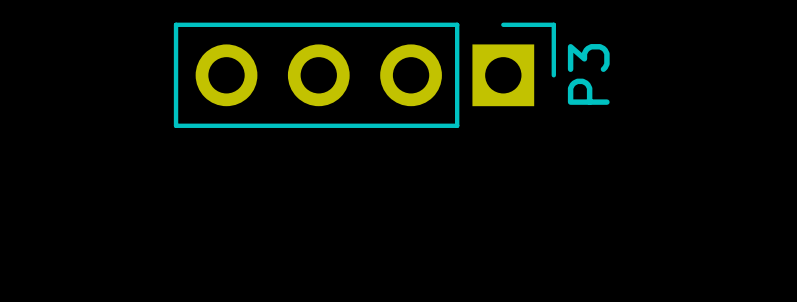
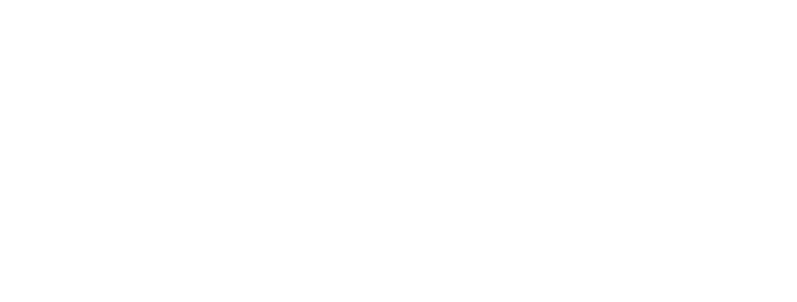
P3: (364, 75) -> none

